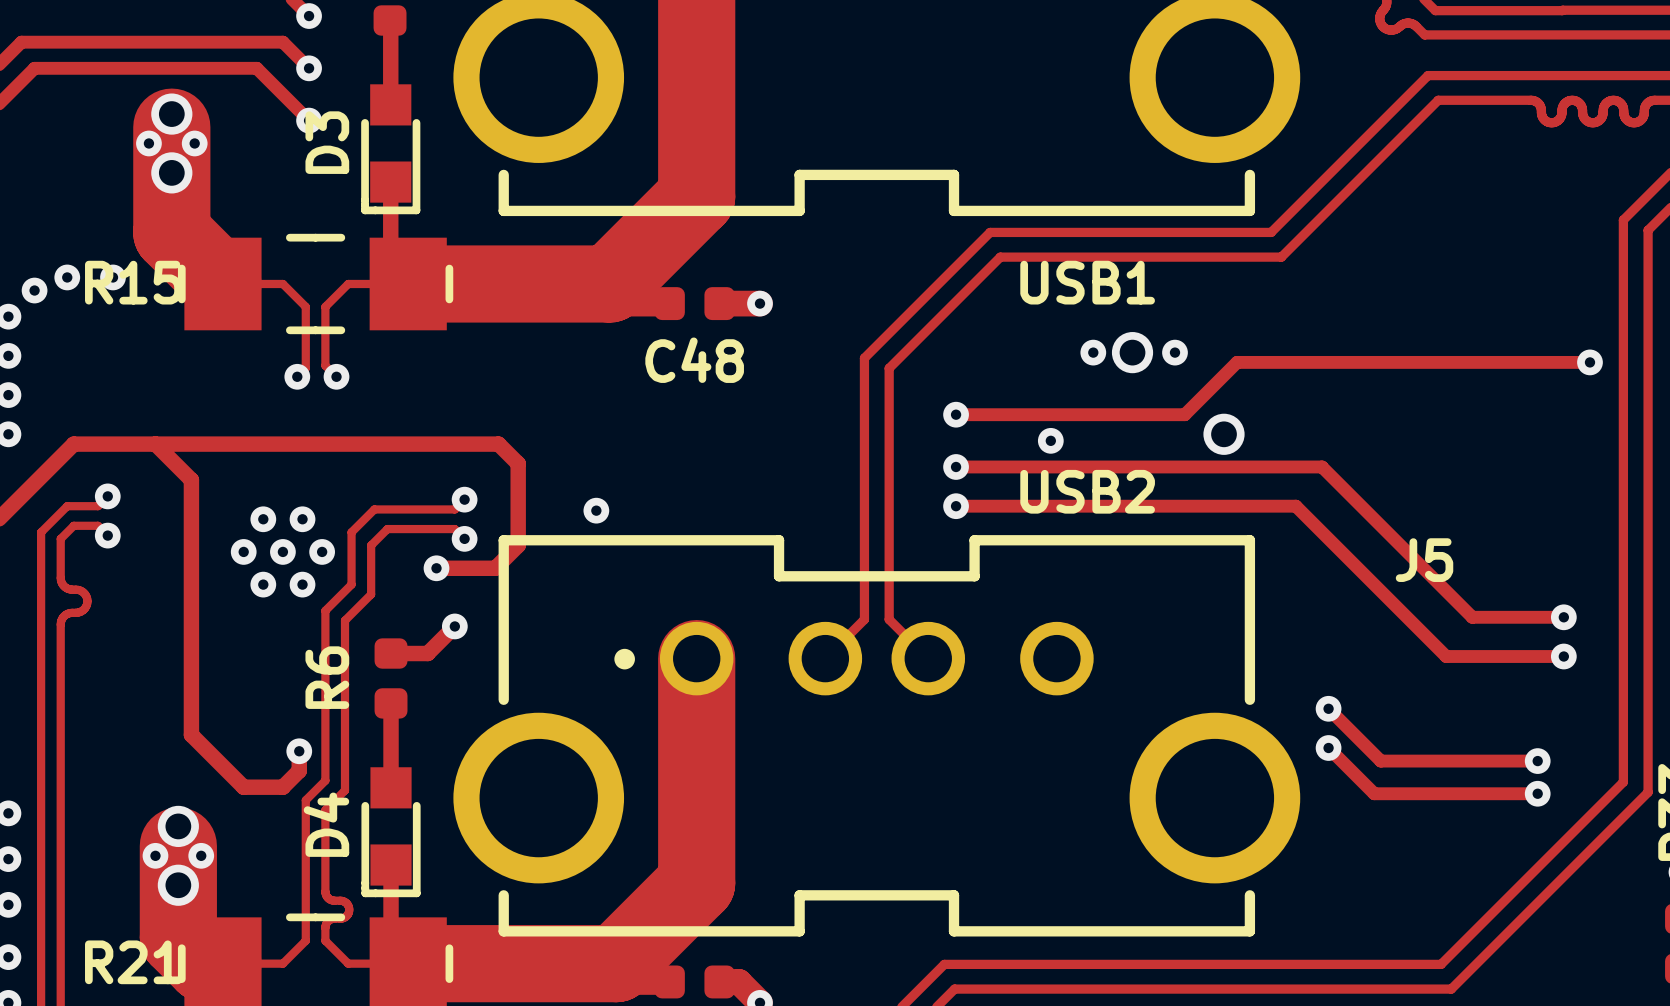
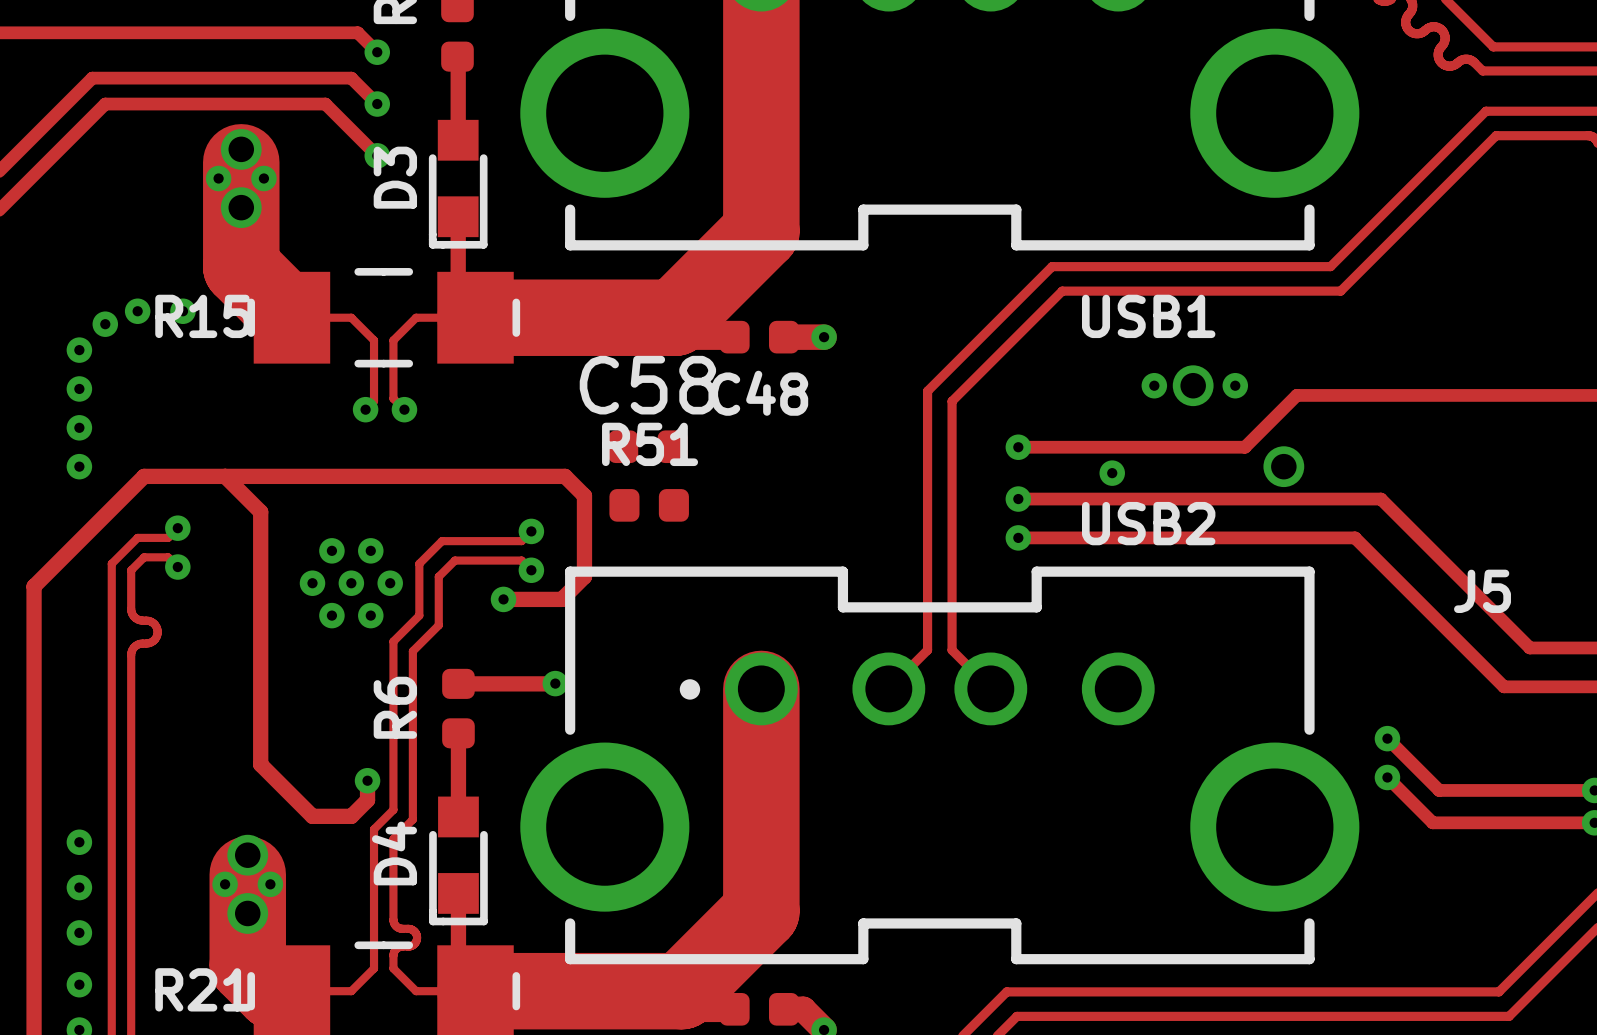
C58: none -> (647, 446)
R51: none -> (649, 505)
via: (596, 510) -> none
track: (454, 626) (427, 653) -> (555, 683) (494, 683)
via position: (454, 626) -> (555, 683)

